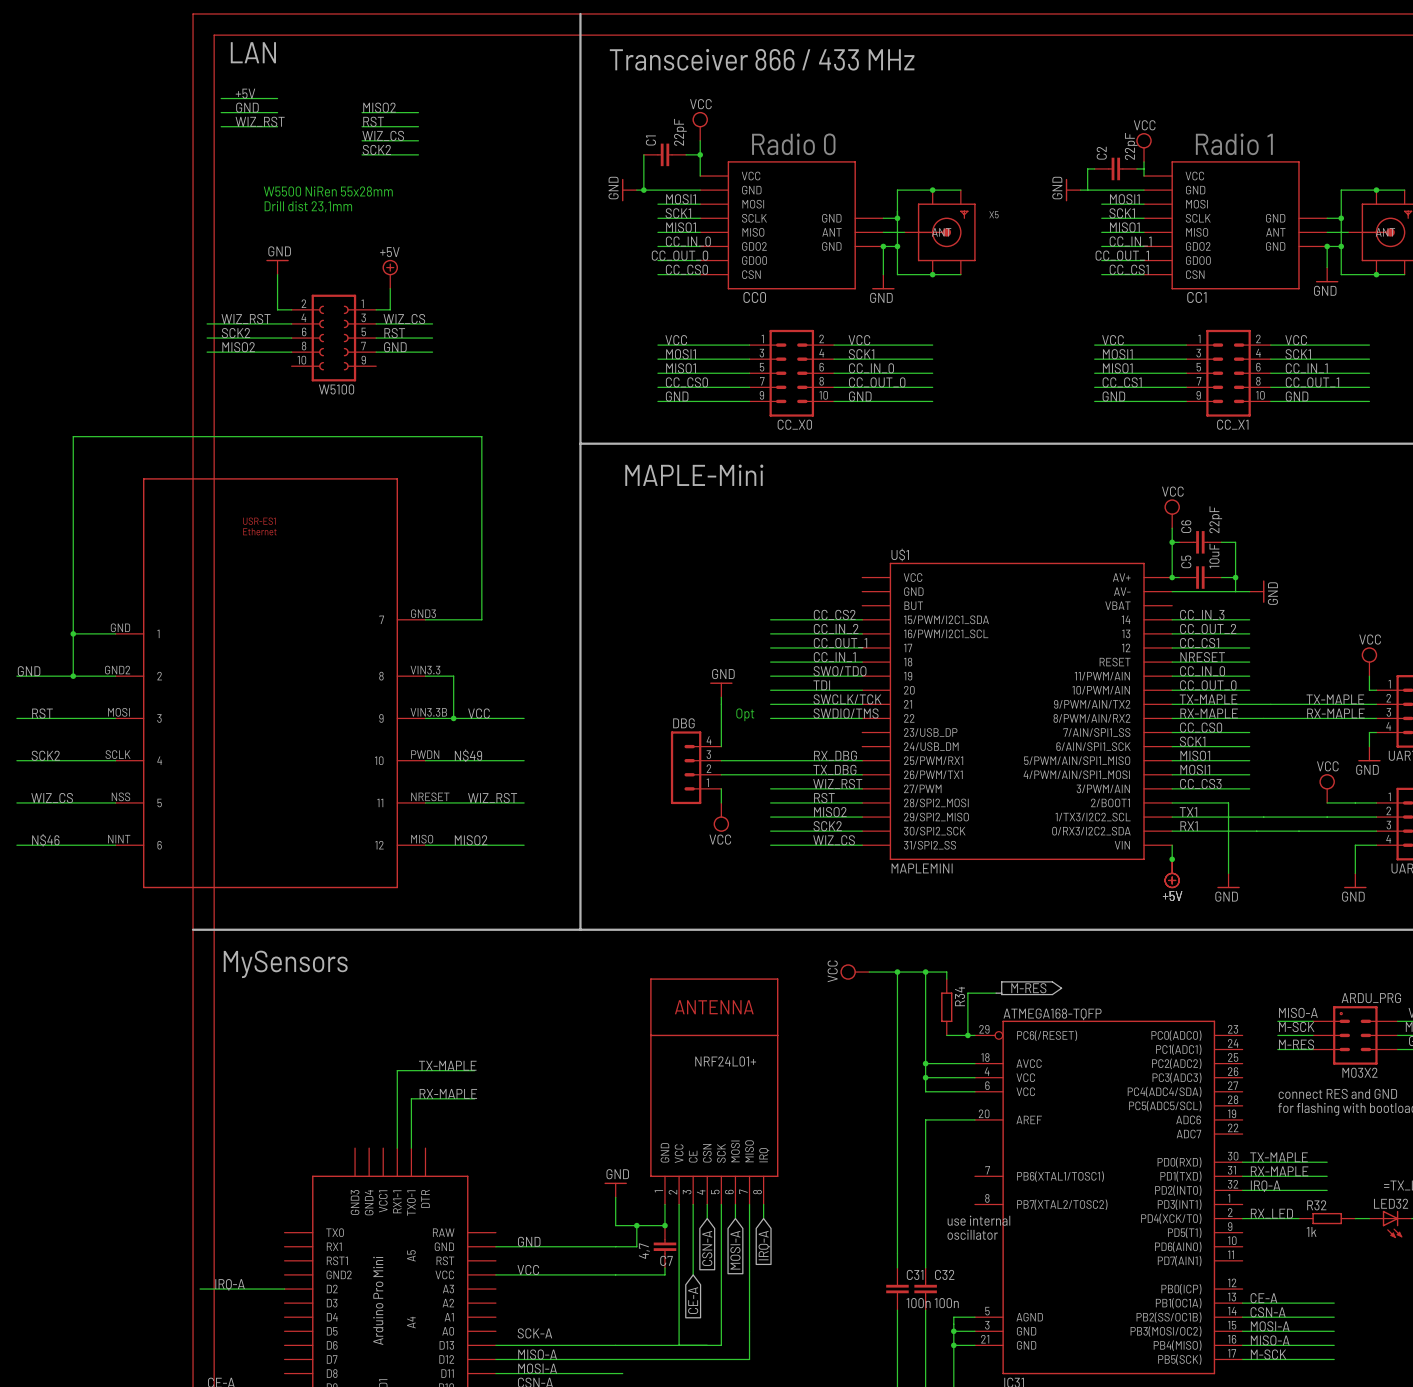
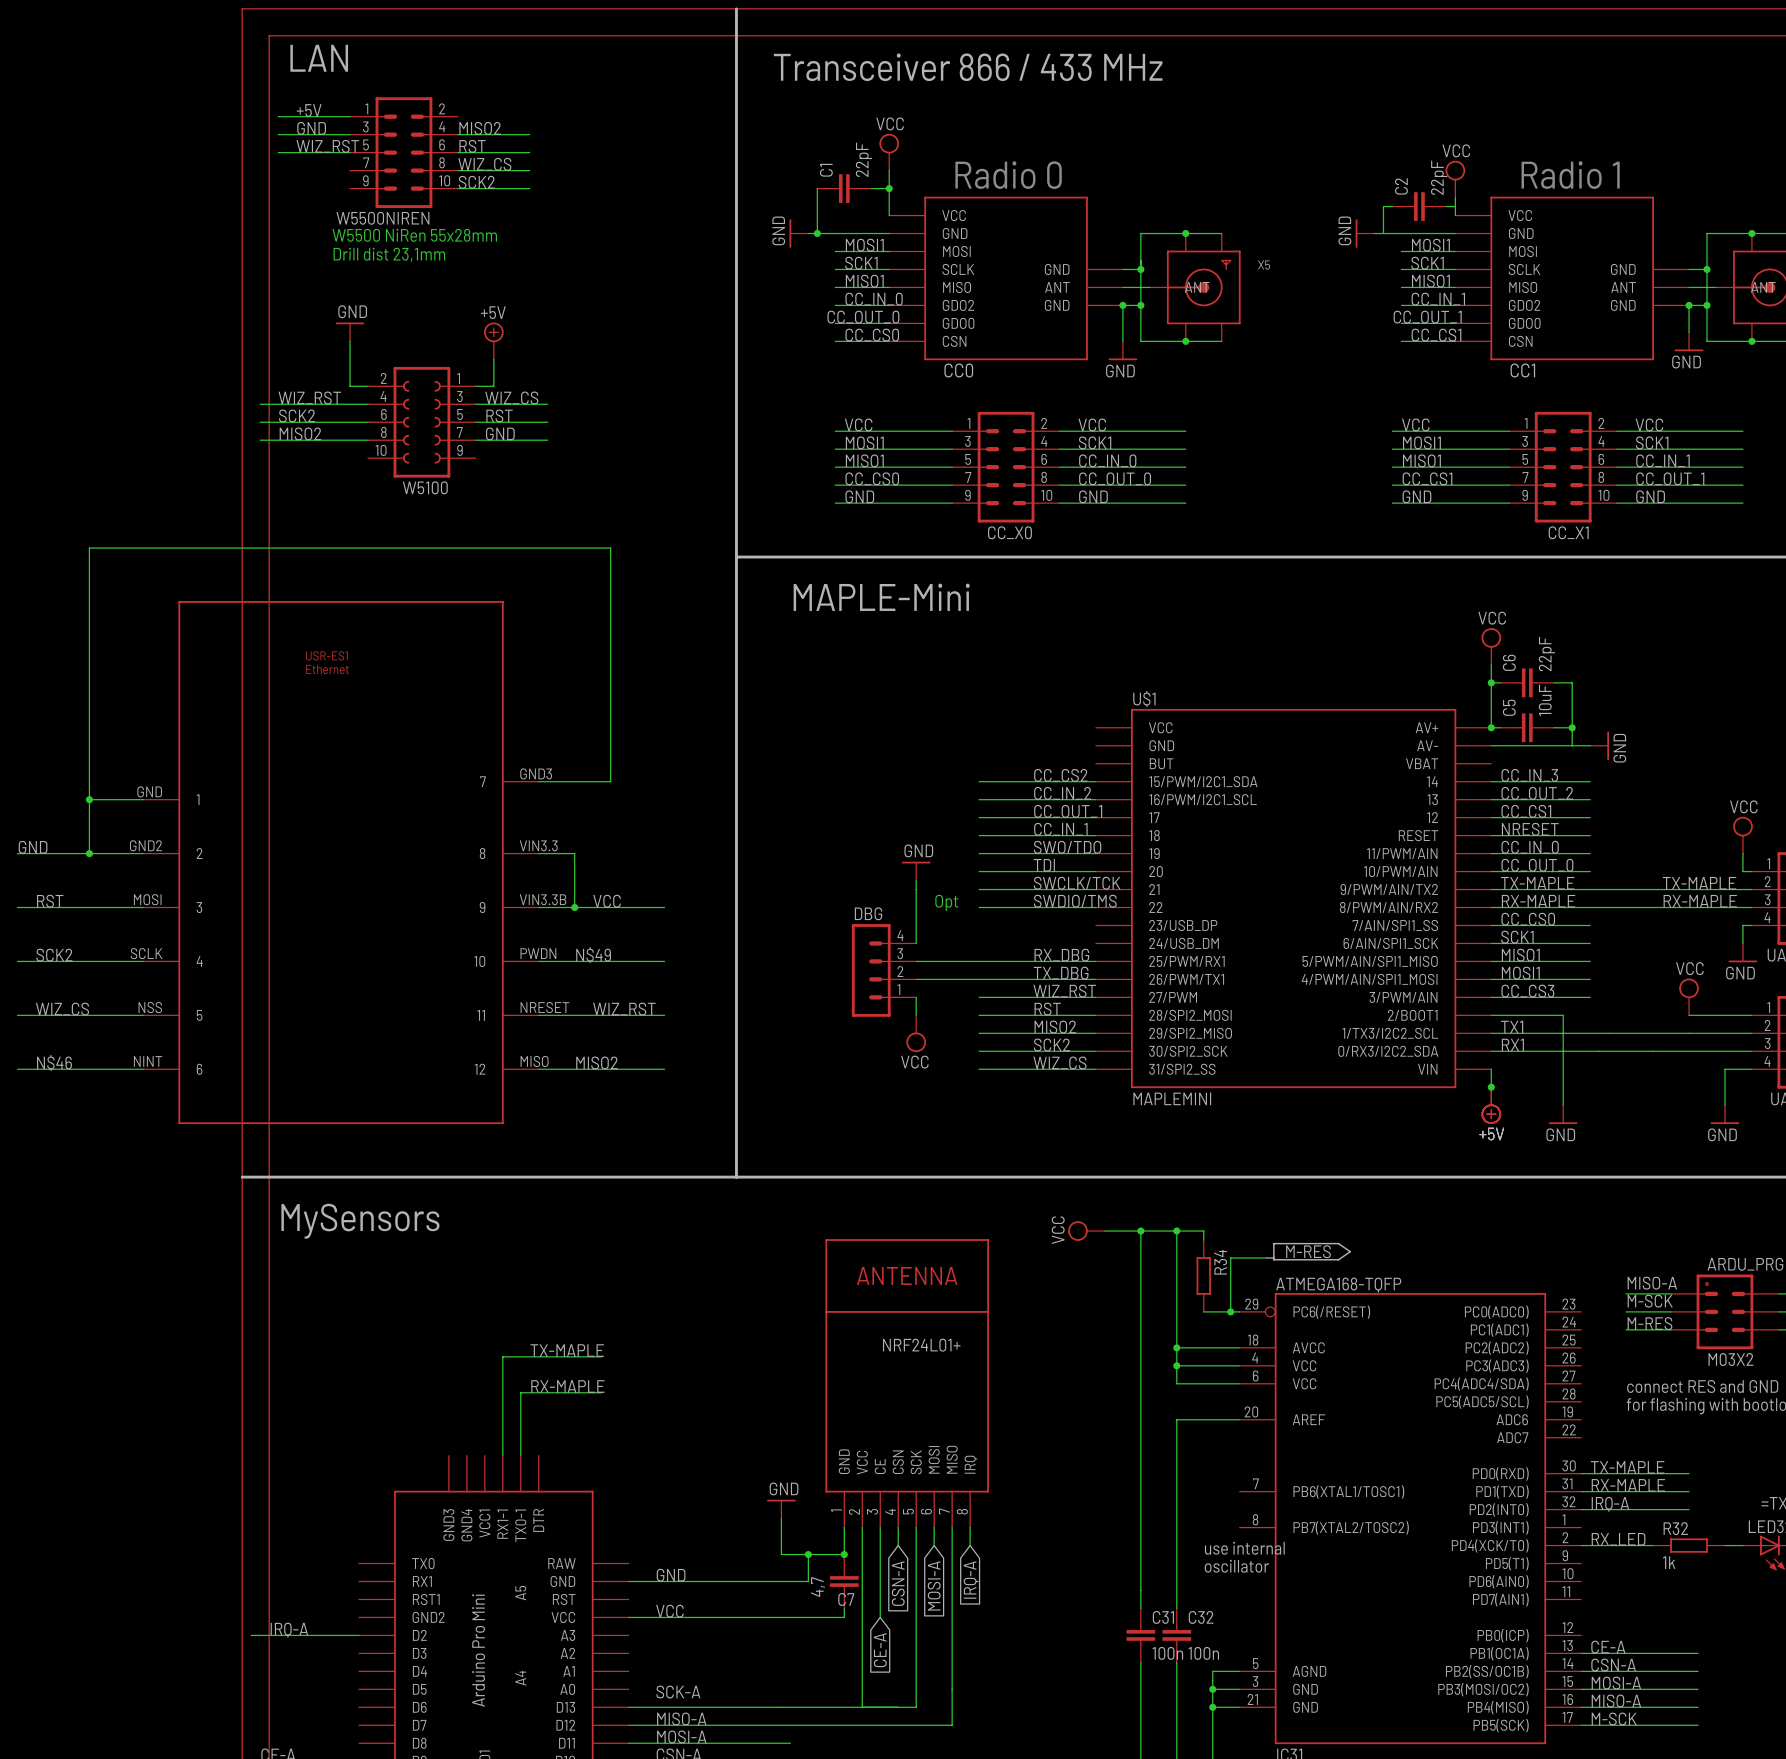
W5500NIREN: none -> (403, 152)

